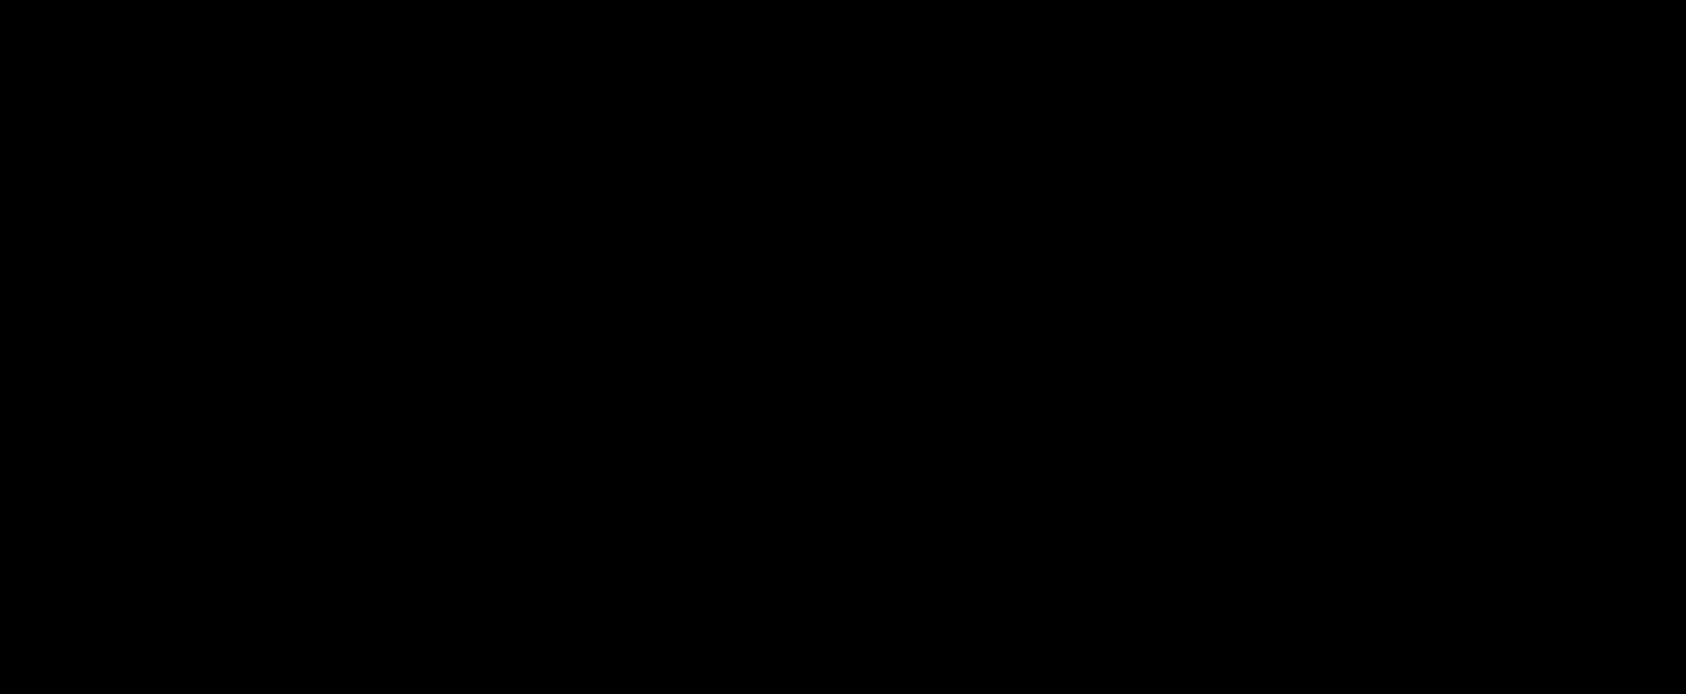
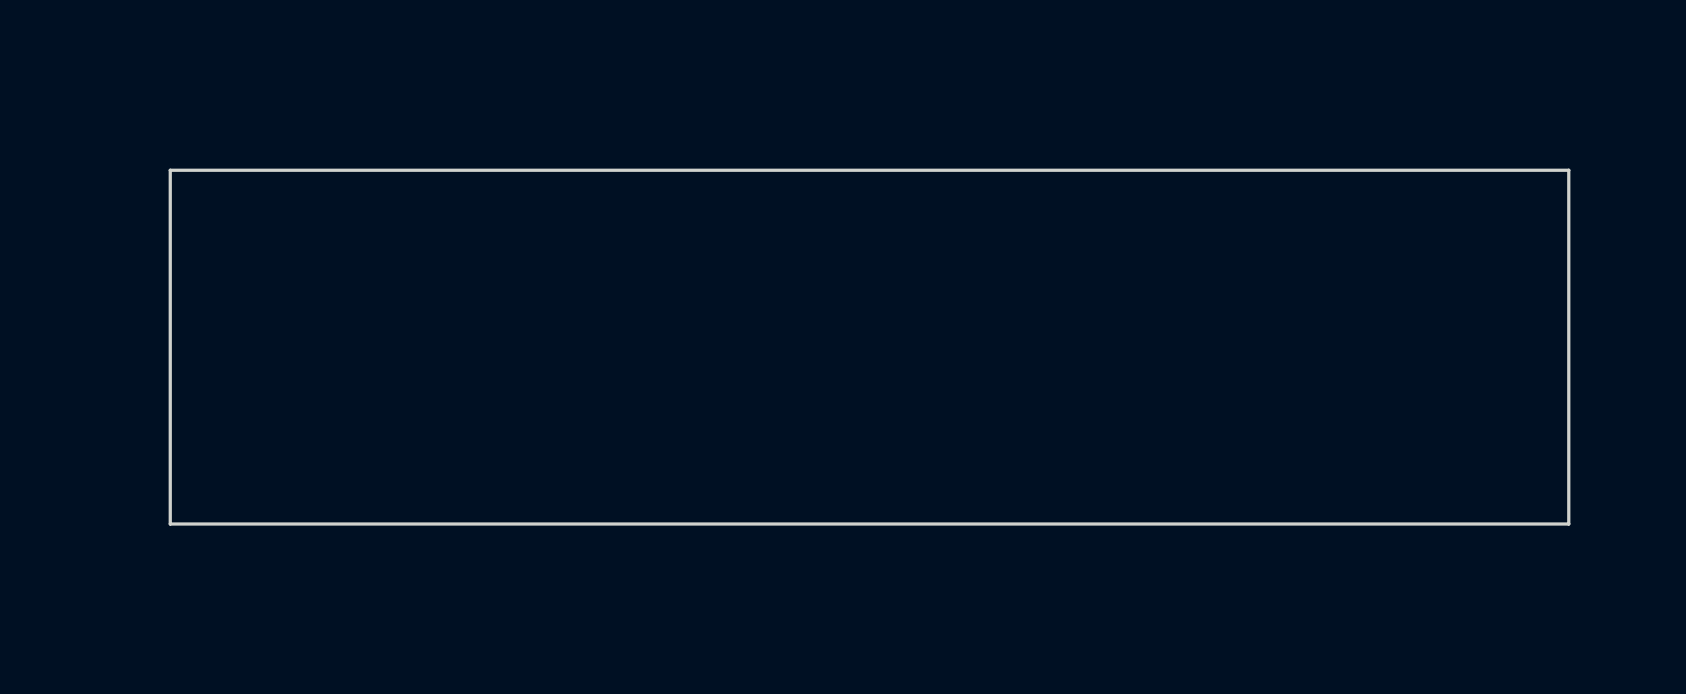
board edge: none -> (1568, 170) (170, 170) (170, 524) (1568, 524) (1568, 170)

